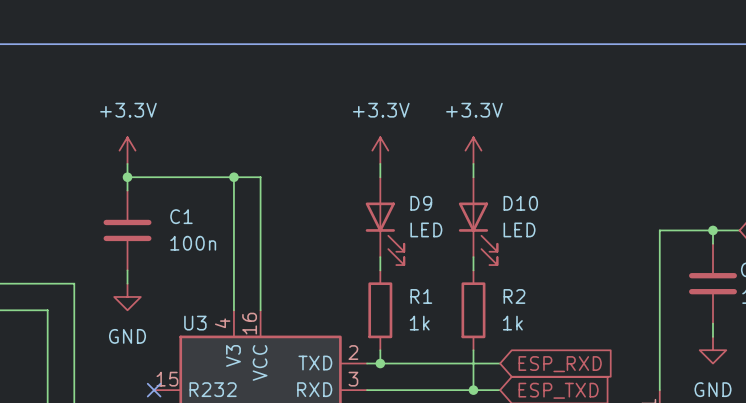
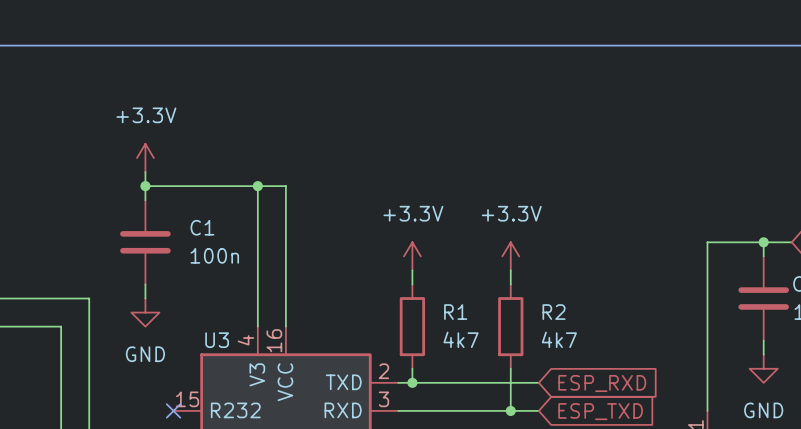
power symbol: +3.3V (380, 150) -> none
power symbol: +3.3V (473, 150) -> none
wire: (380, 163) (380, 177) -> none
wire: (473, 163) (473, 177) -> none
D9: LED (384, 221) -> none
D10: LED (478, 221) -> none
power symbol: none -> +3.3V (412, 256)
power symbol: none -> +3.3V (510, 256)
R1 value: 1k (419, 323) -> 4k7 (461, 339)
R2 value: 1k (512, 323) -> 4k7 (559, 339)

